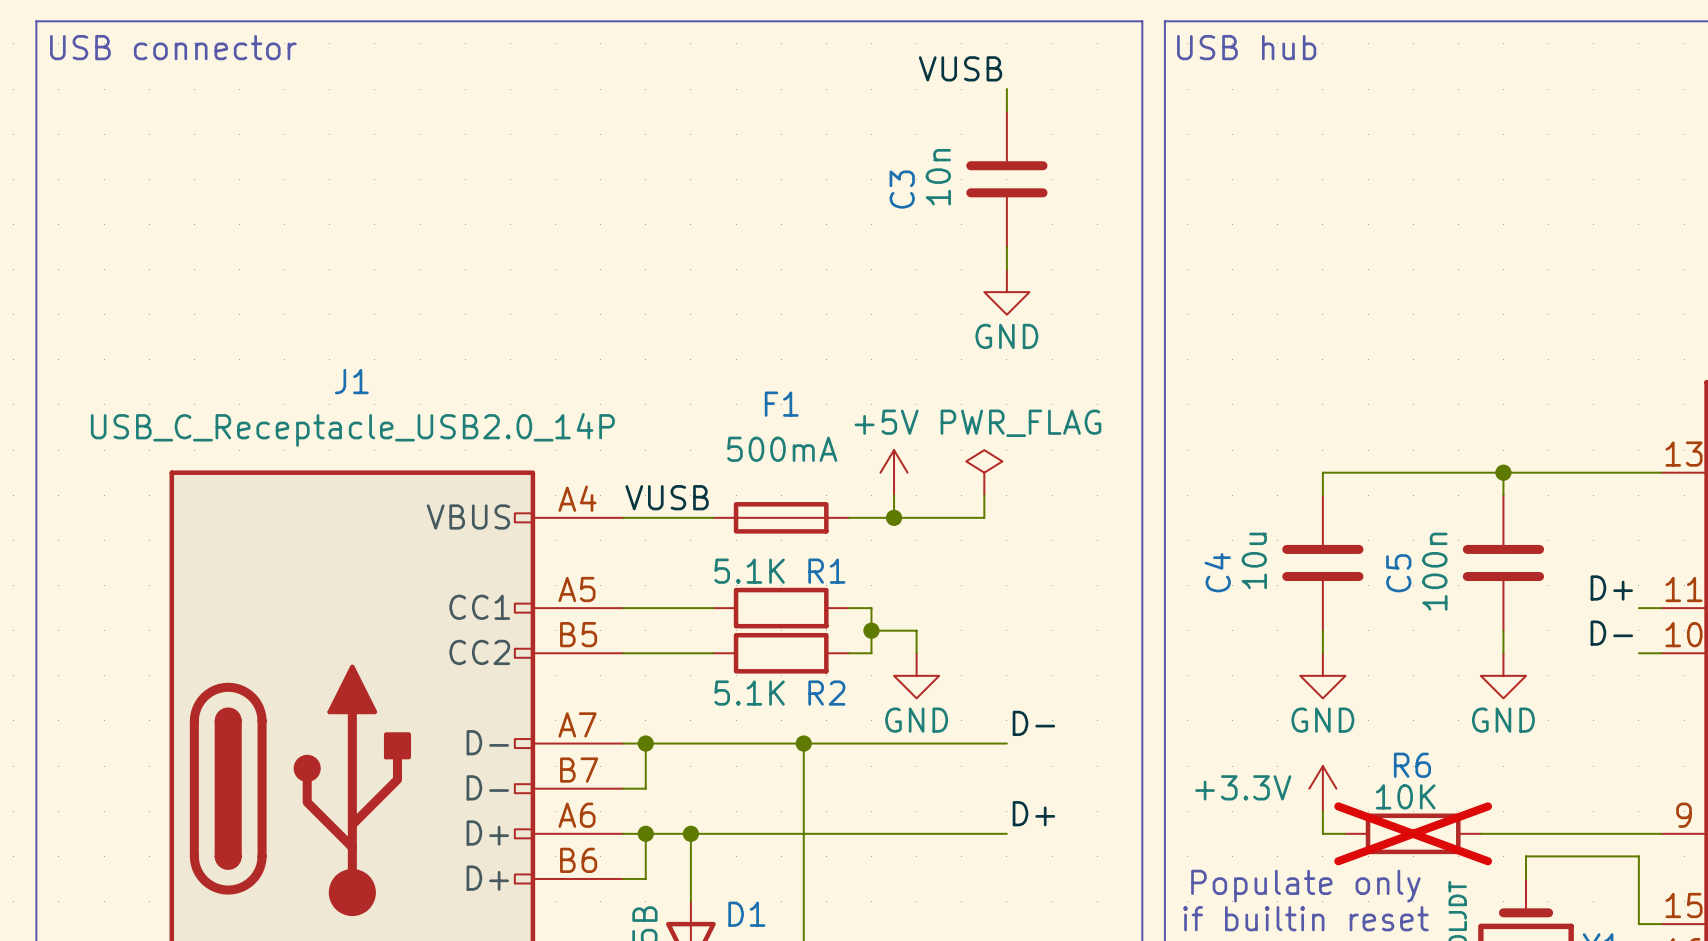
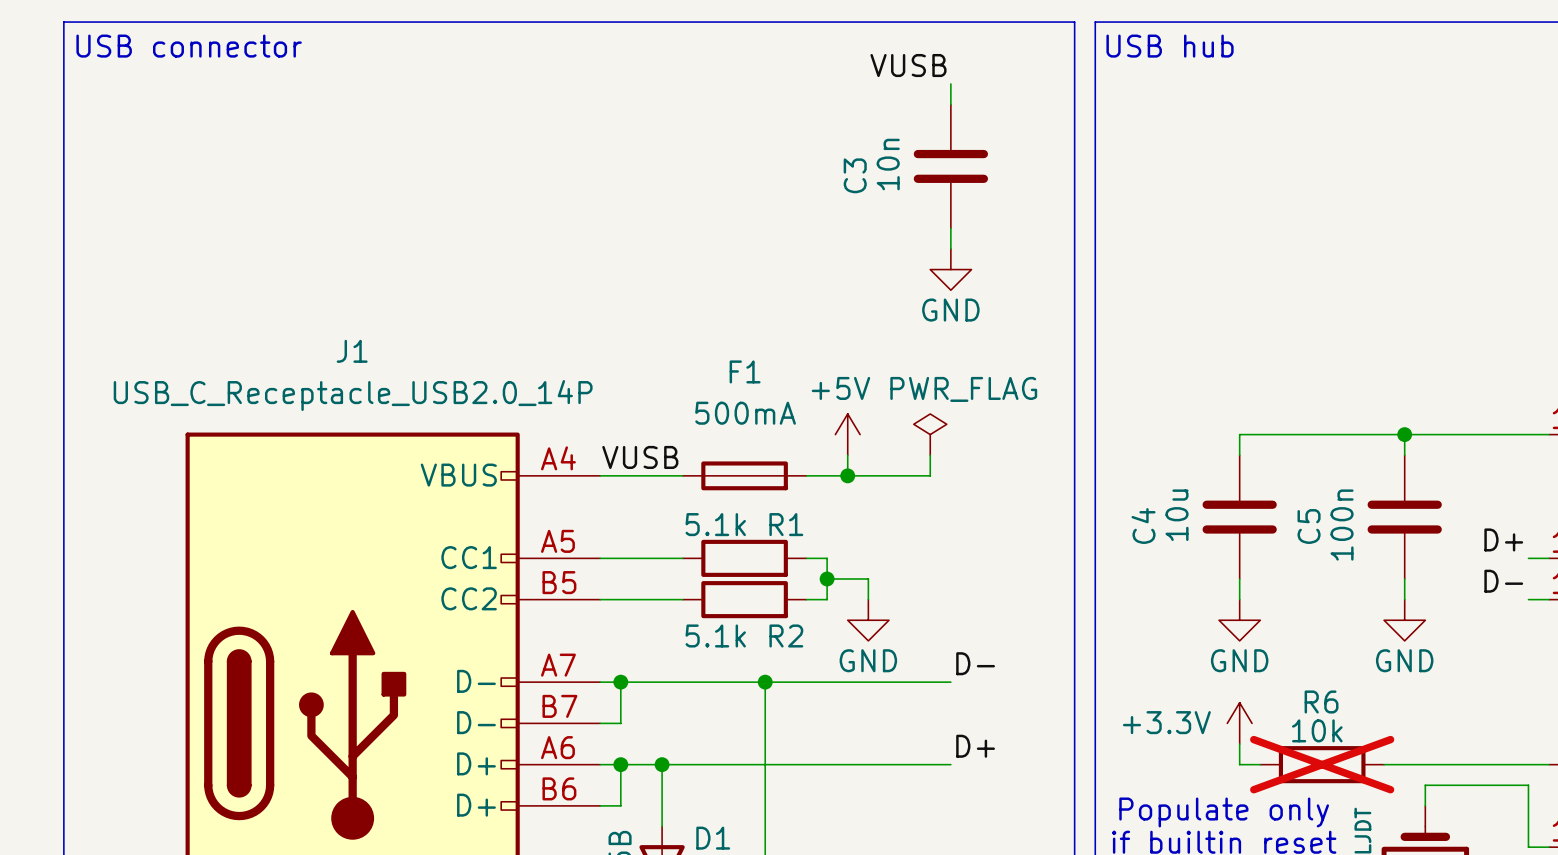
R1 value: 5.1K (749, 571) -> 5.1k (715, 524)
R2 value: 5.1K (749, 693) -> 5.1k (715, 635)
R6 value: 10K (1405, 796) -> 10k (1317, 730)

